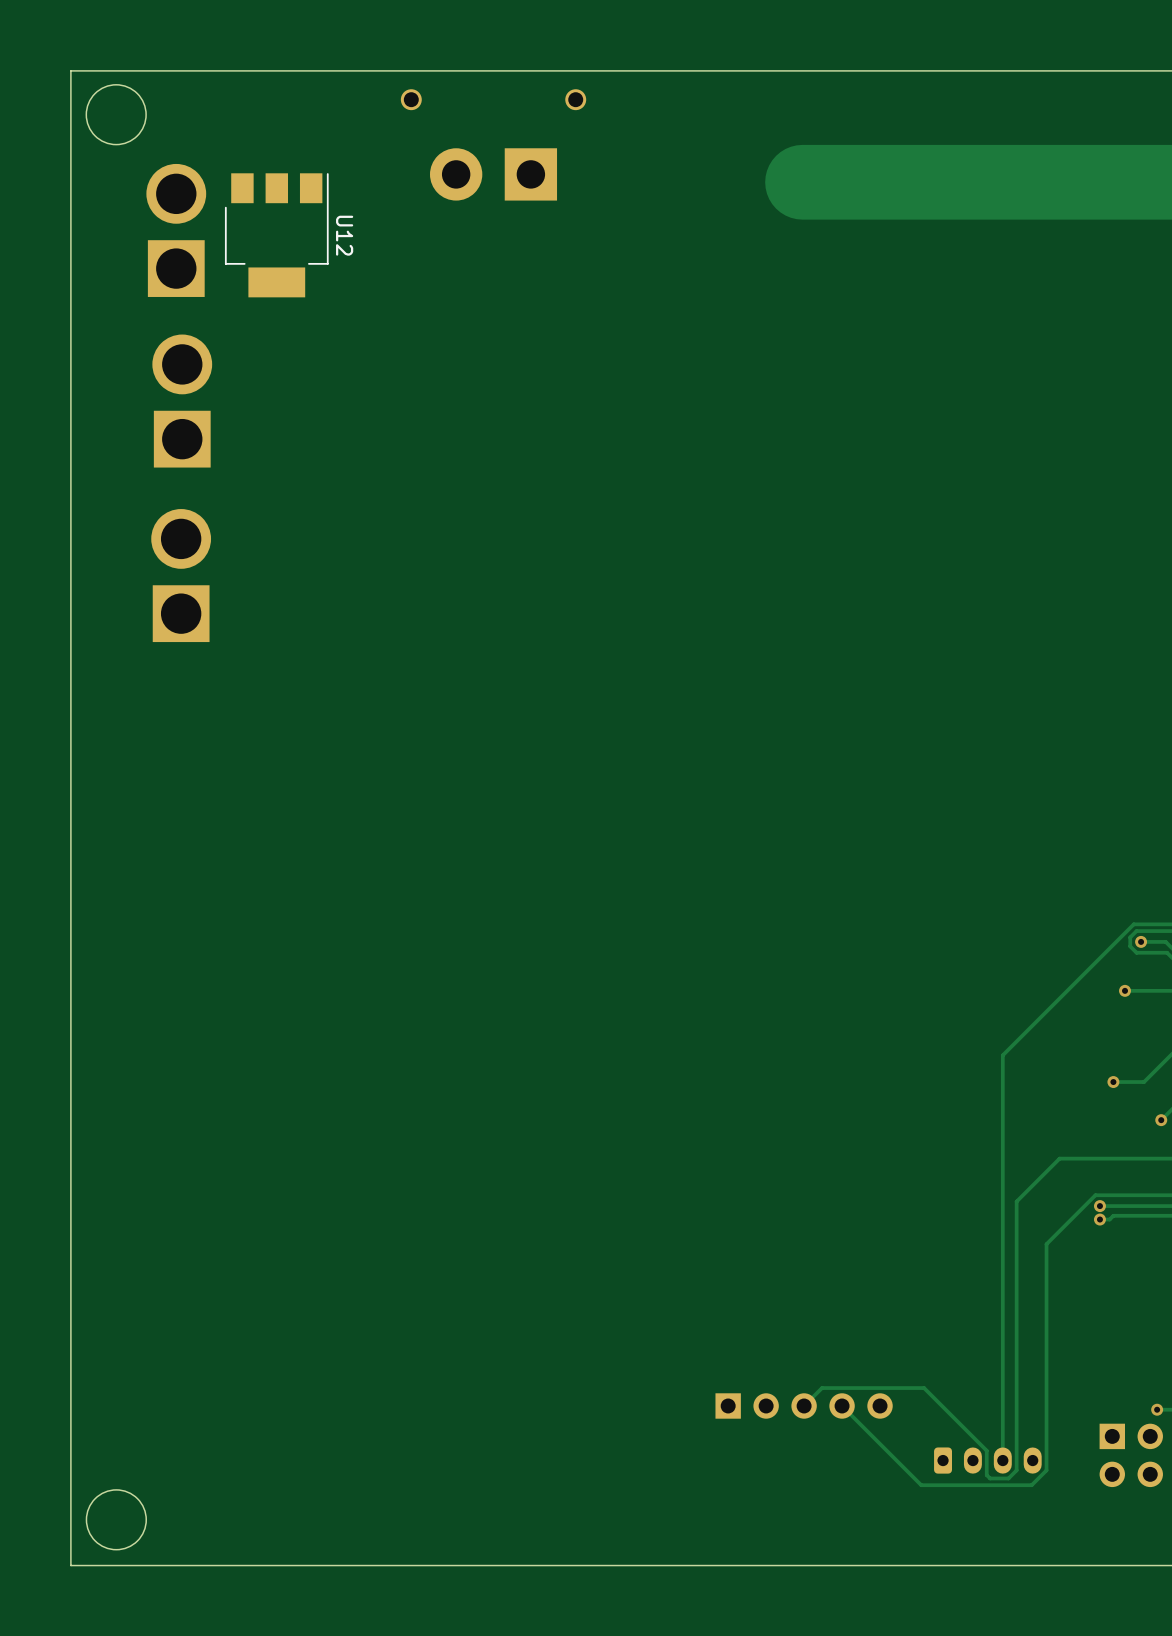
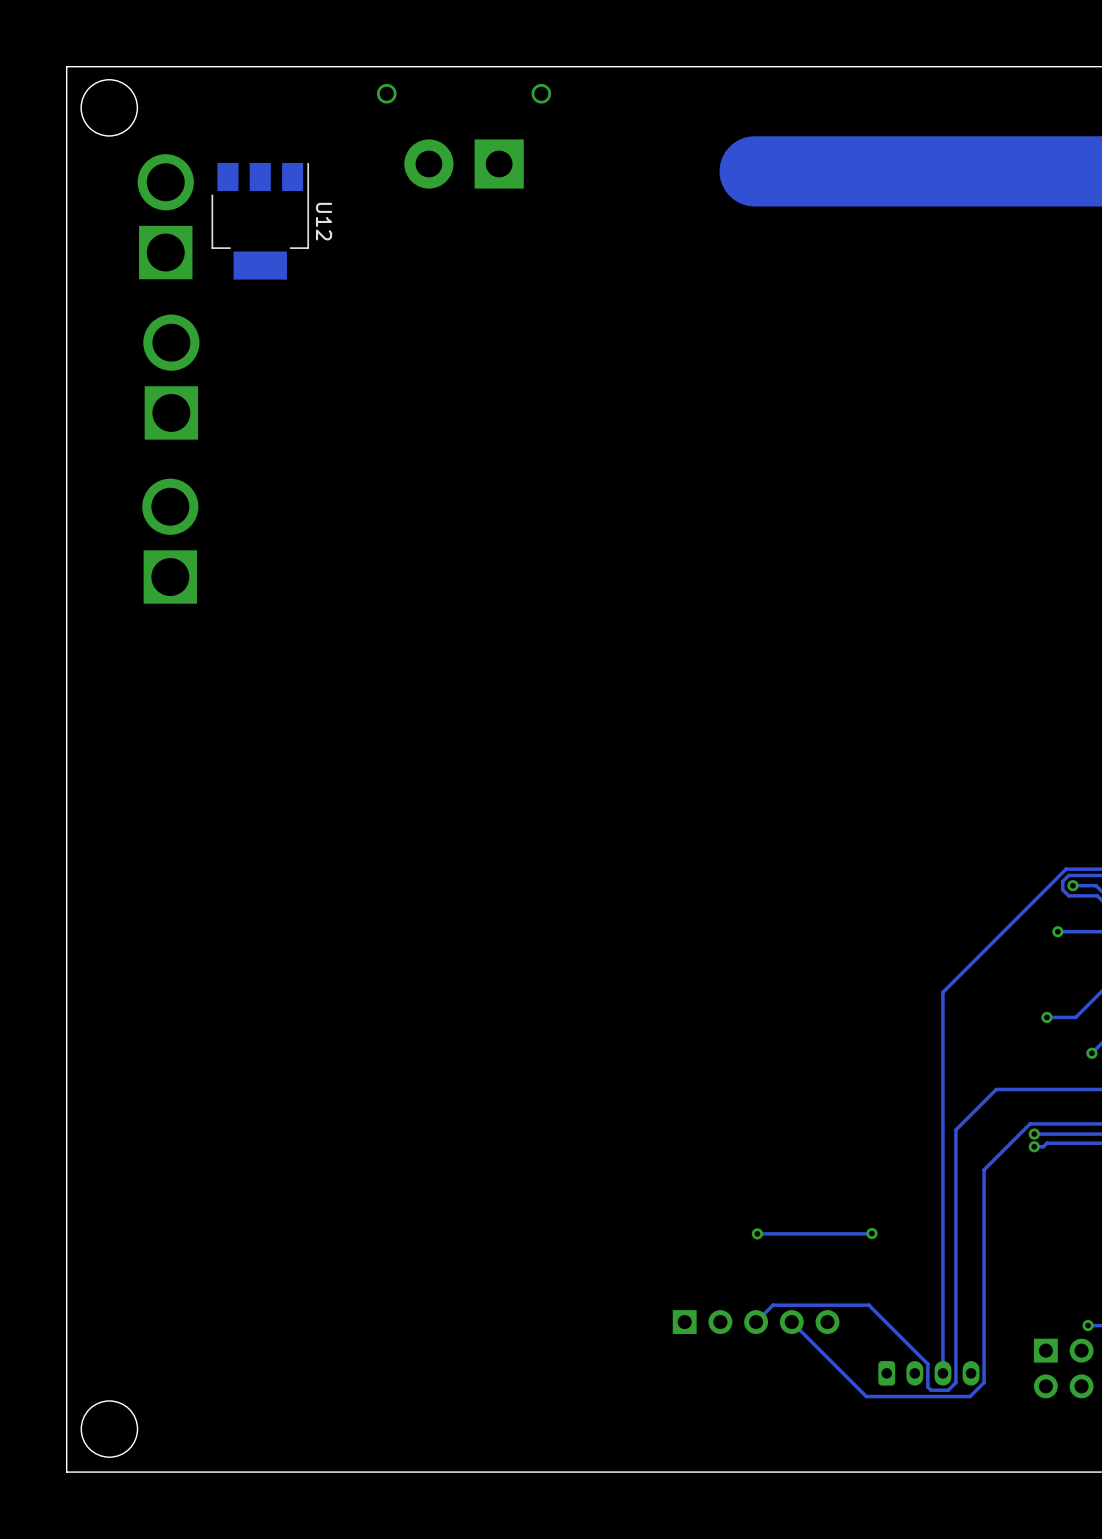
track: none -> (871, 1233) (757, 1233)
via: none -> (871, 1233)
via: none -> (757, 1233)

